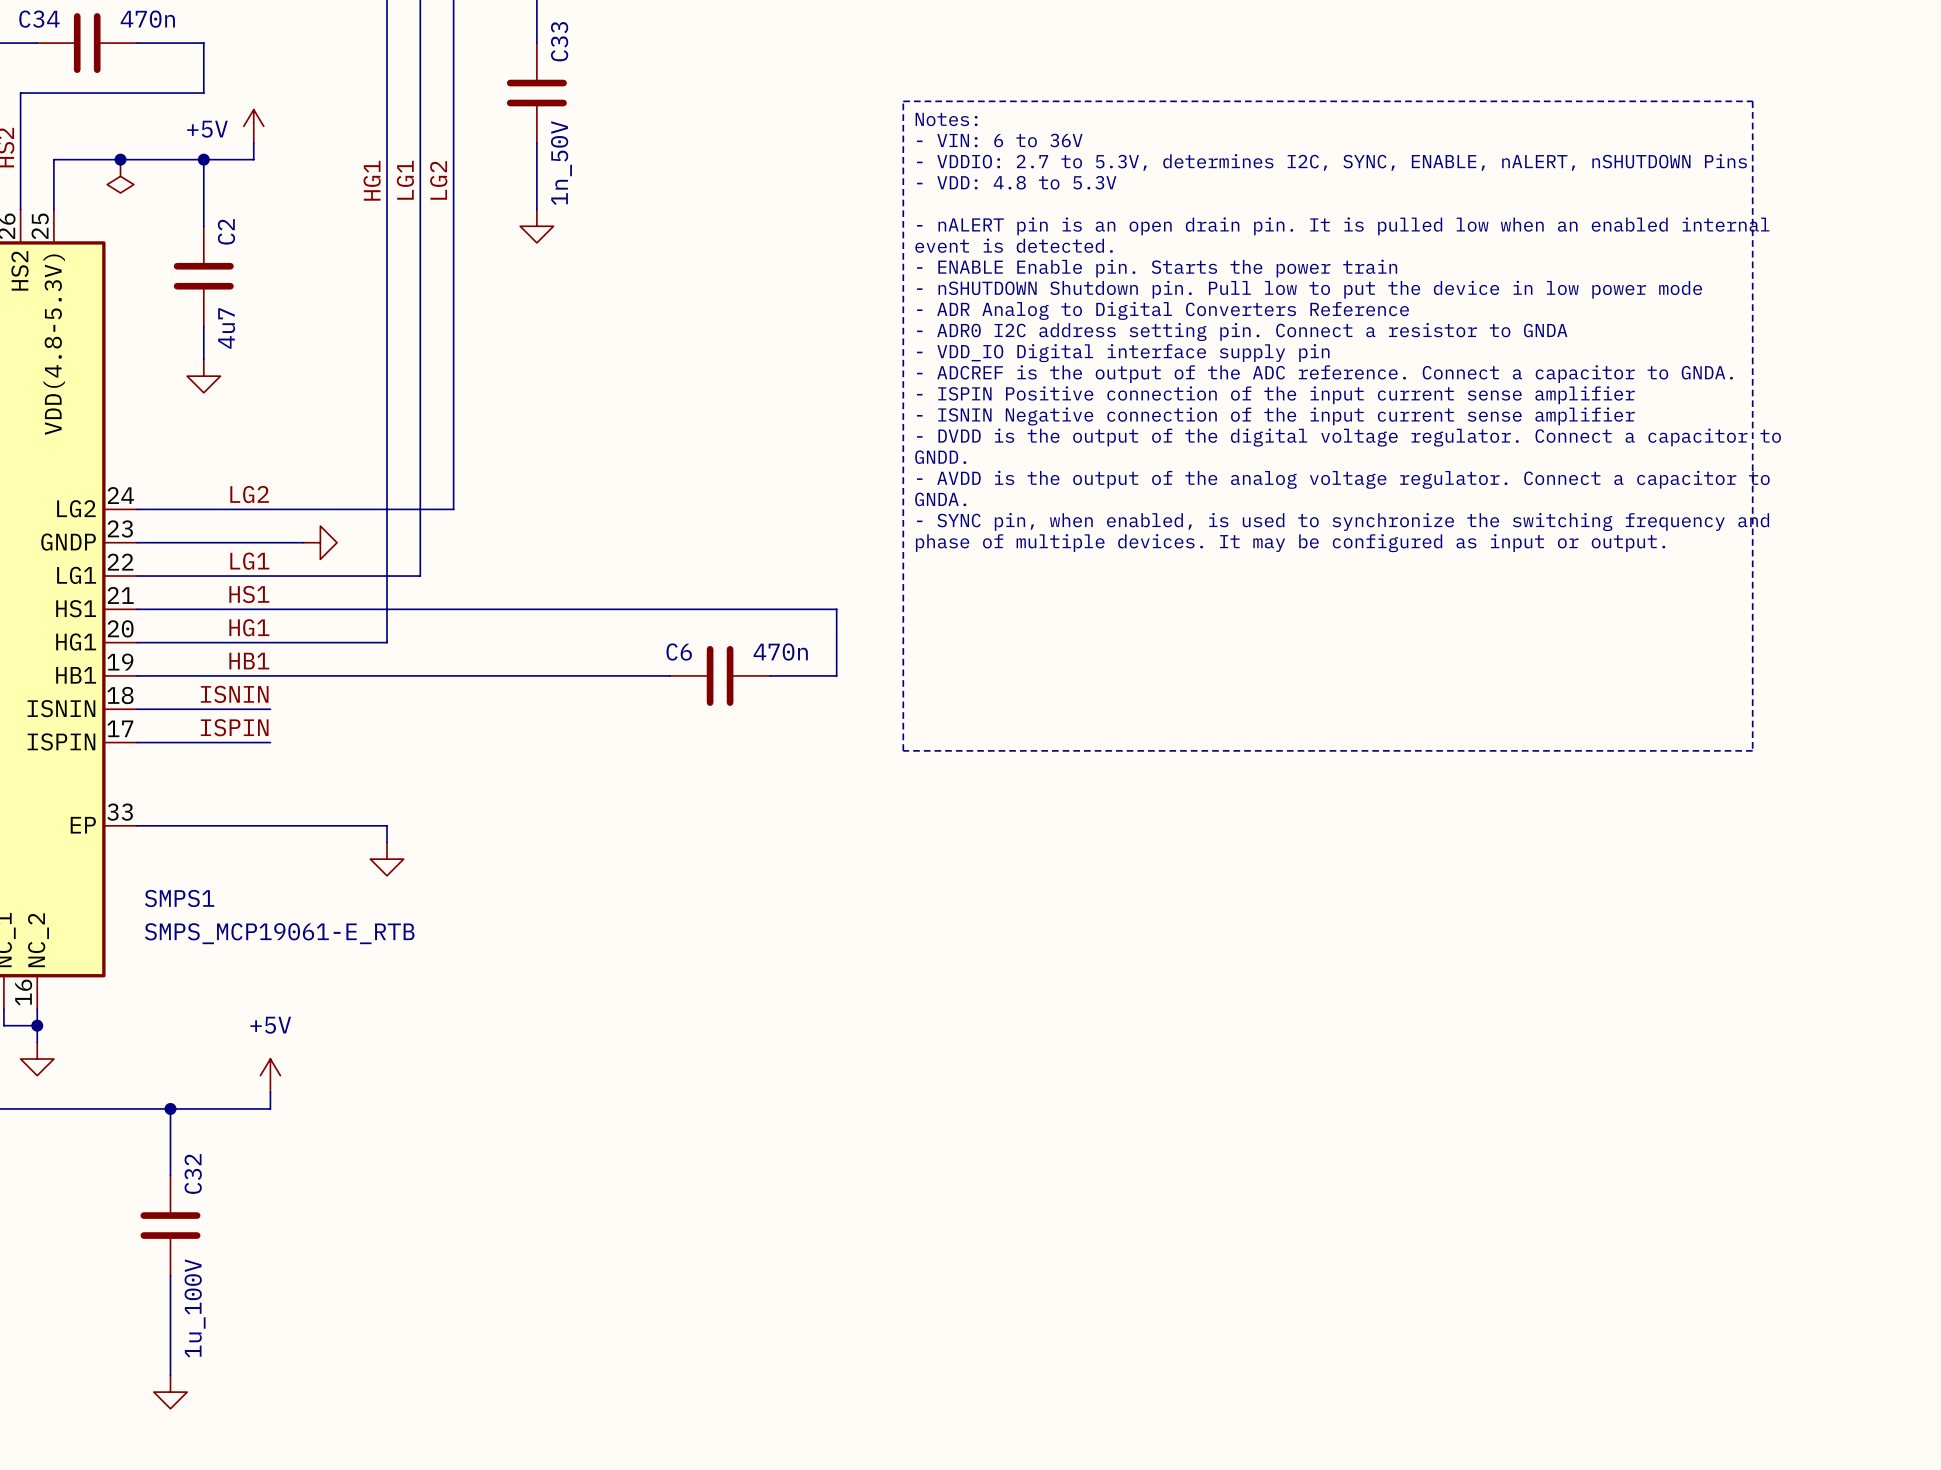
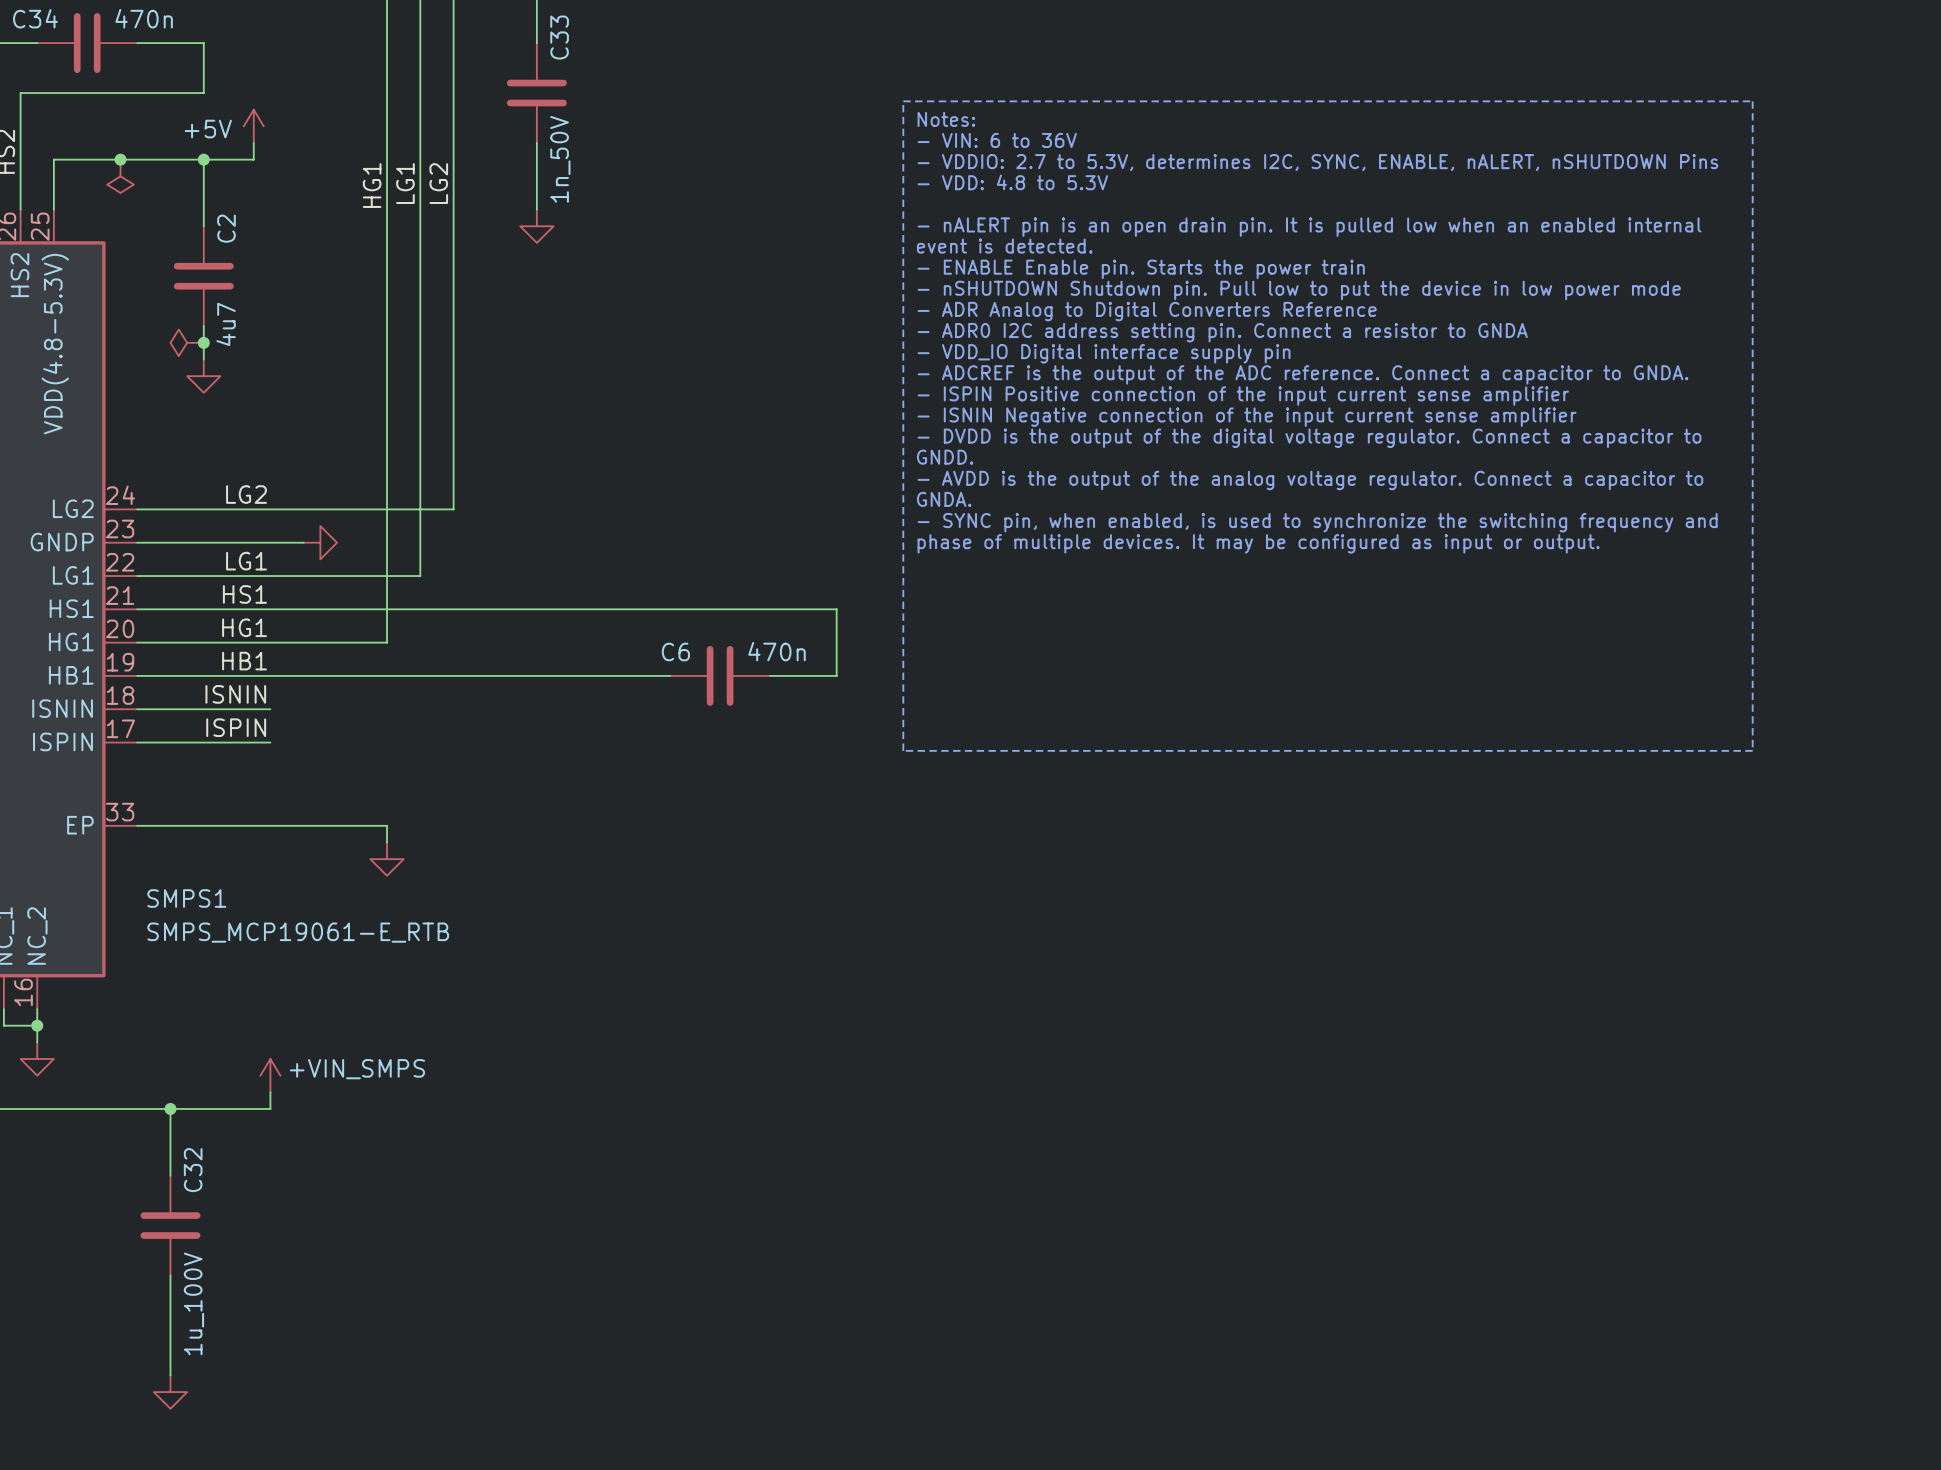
power symbol: none -> (187, 342)
junction: none -> (203, 342)
power symbol: +5V (270, 1075) -> +VIN_SMPS (270, 1075)

